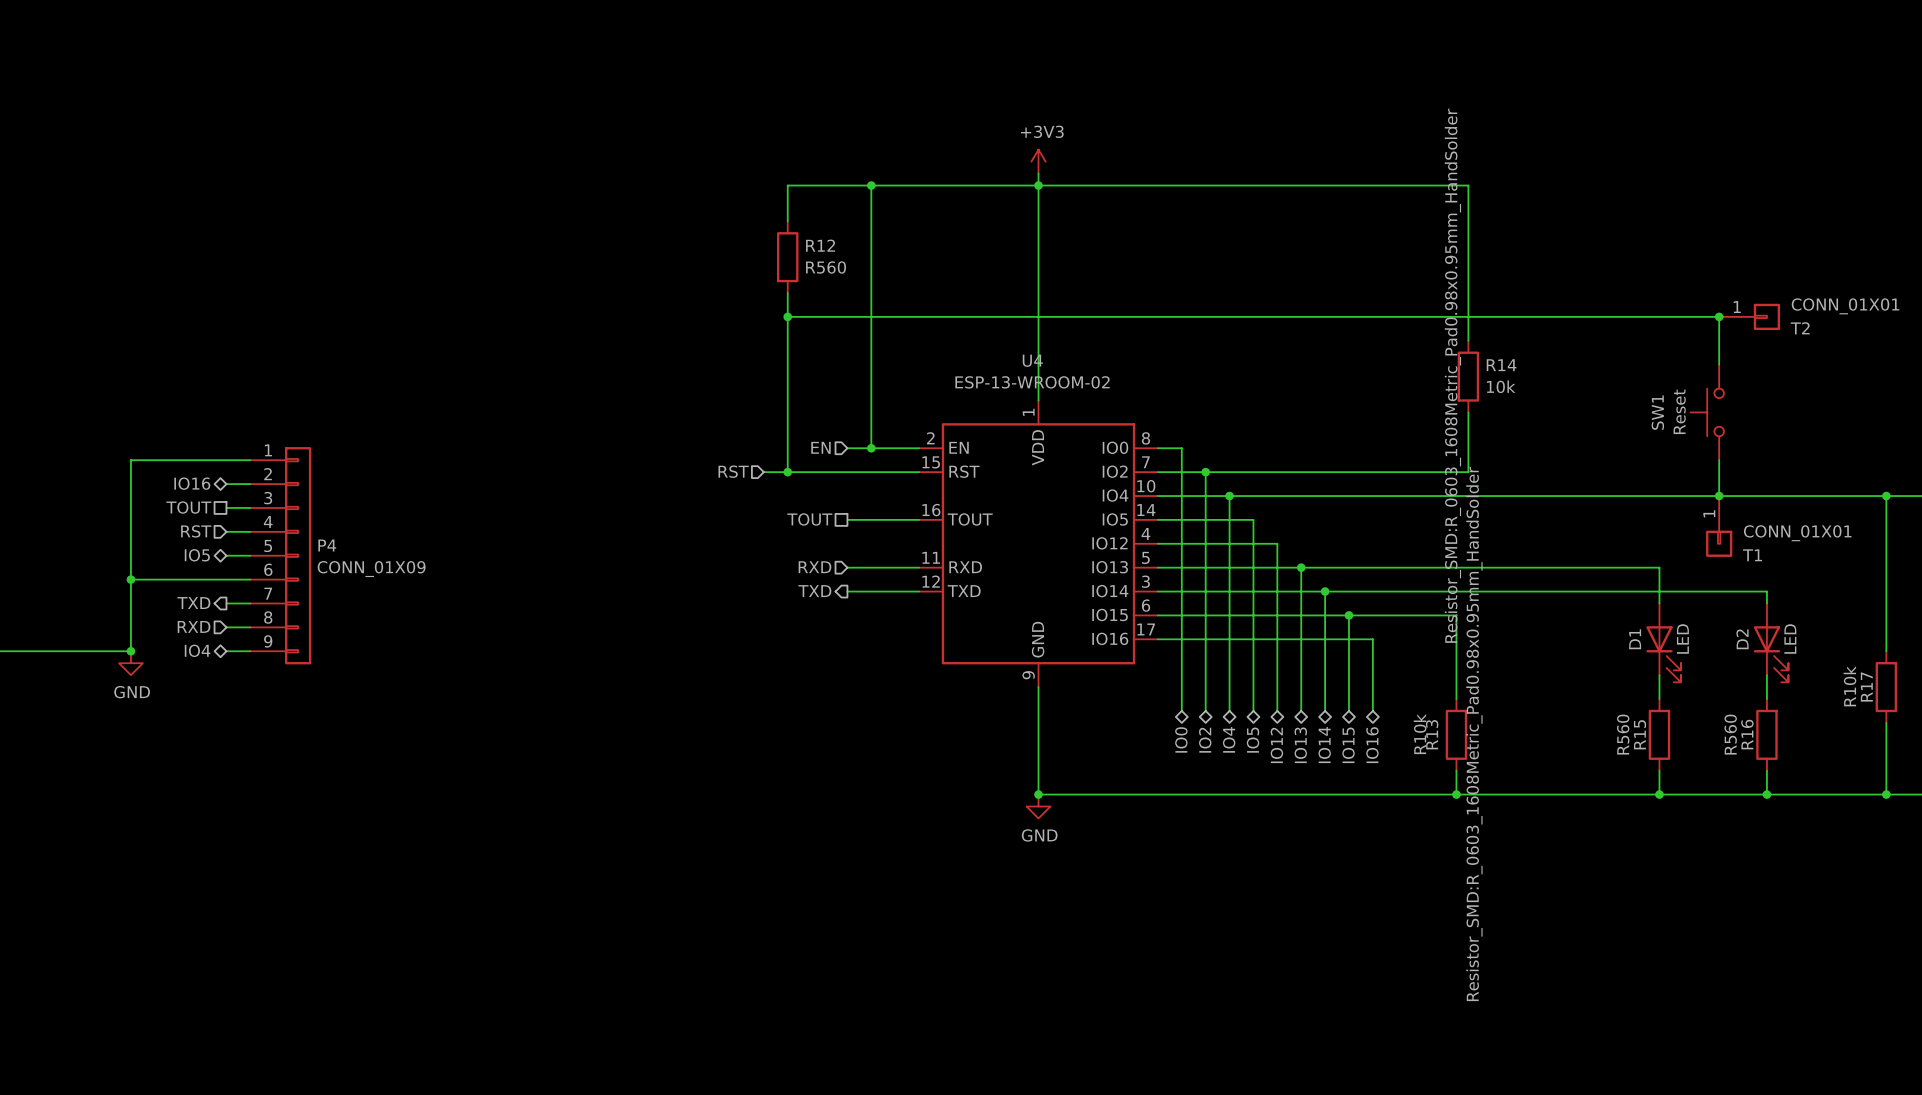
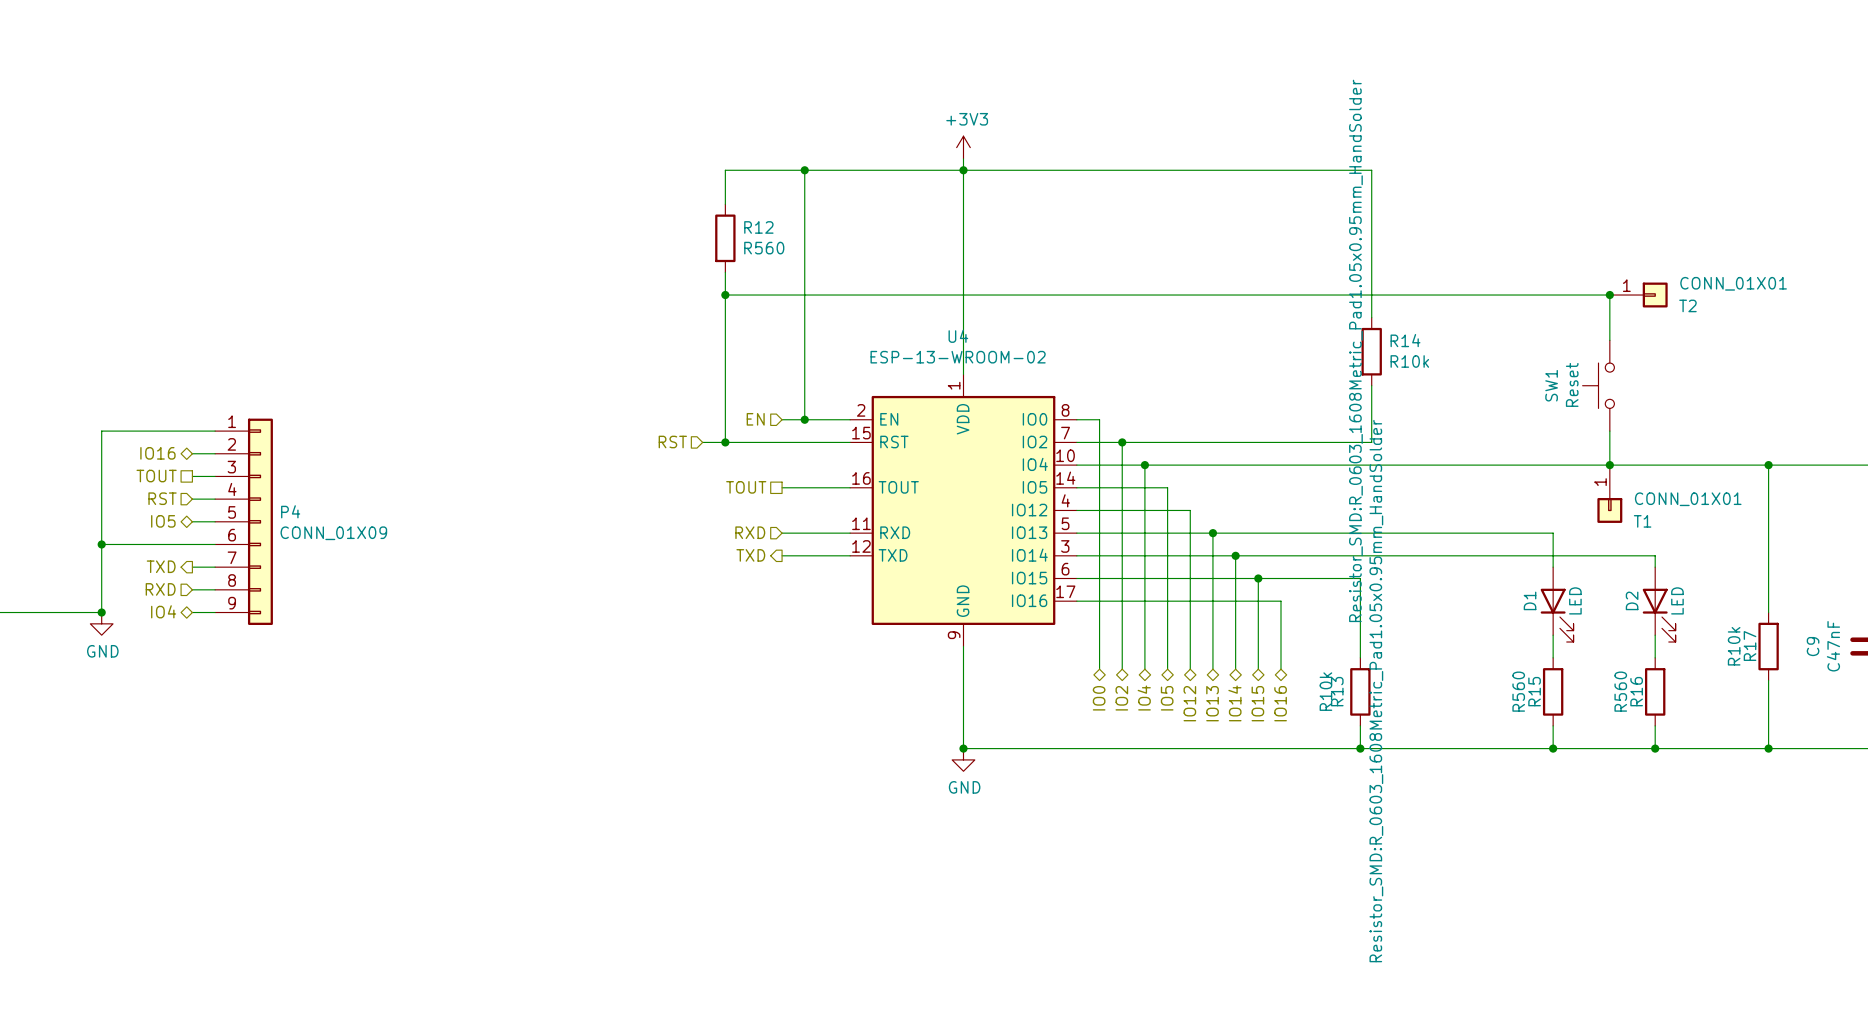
R14 text: Resistor_SMD:R_0603_1608Metric_Pad0.98x0.95mm_HandSolder (1452, 375) -> Resistor_SMD:R_0603_1608Metric_Pad1.05x0.95mm_HandSolder (1355, 350)
R14 value: 10k (1501, 386) -> R10k (1409, 361)
R13 text: Resistor_SMD:R_0603_1608Metric_Pad0.98x0.95mm_HandSolder (1474, 734) -> Resistor_SMD:R_0603_1608Metric_Pad1.05x0.95mm_HandSolder (1376, 691)

